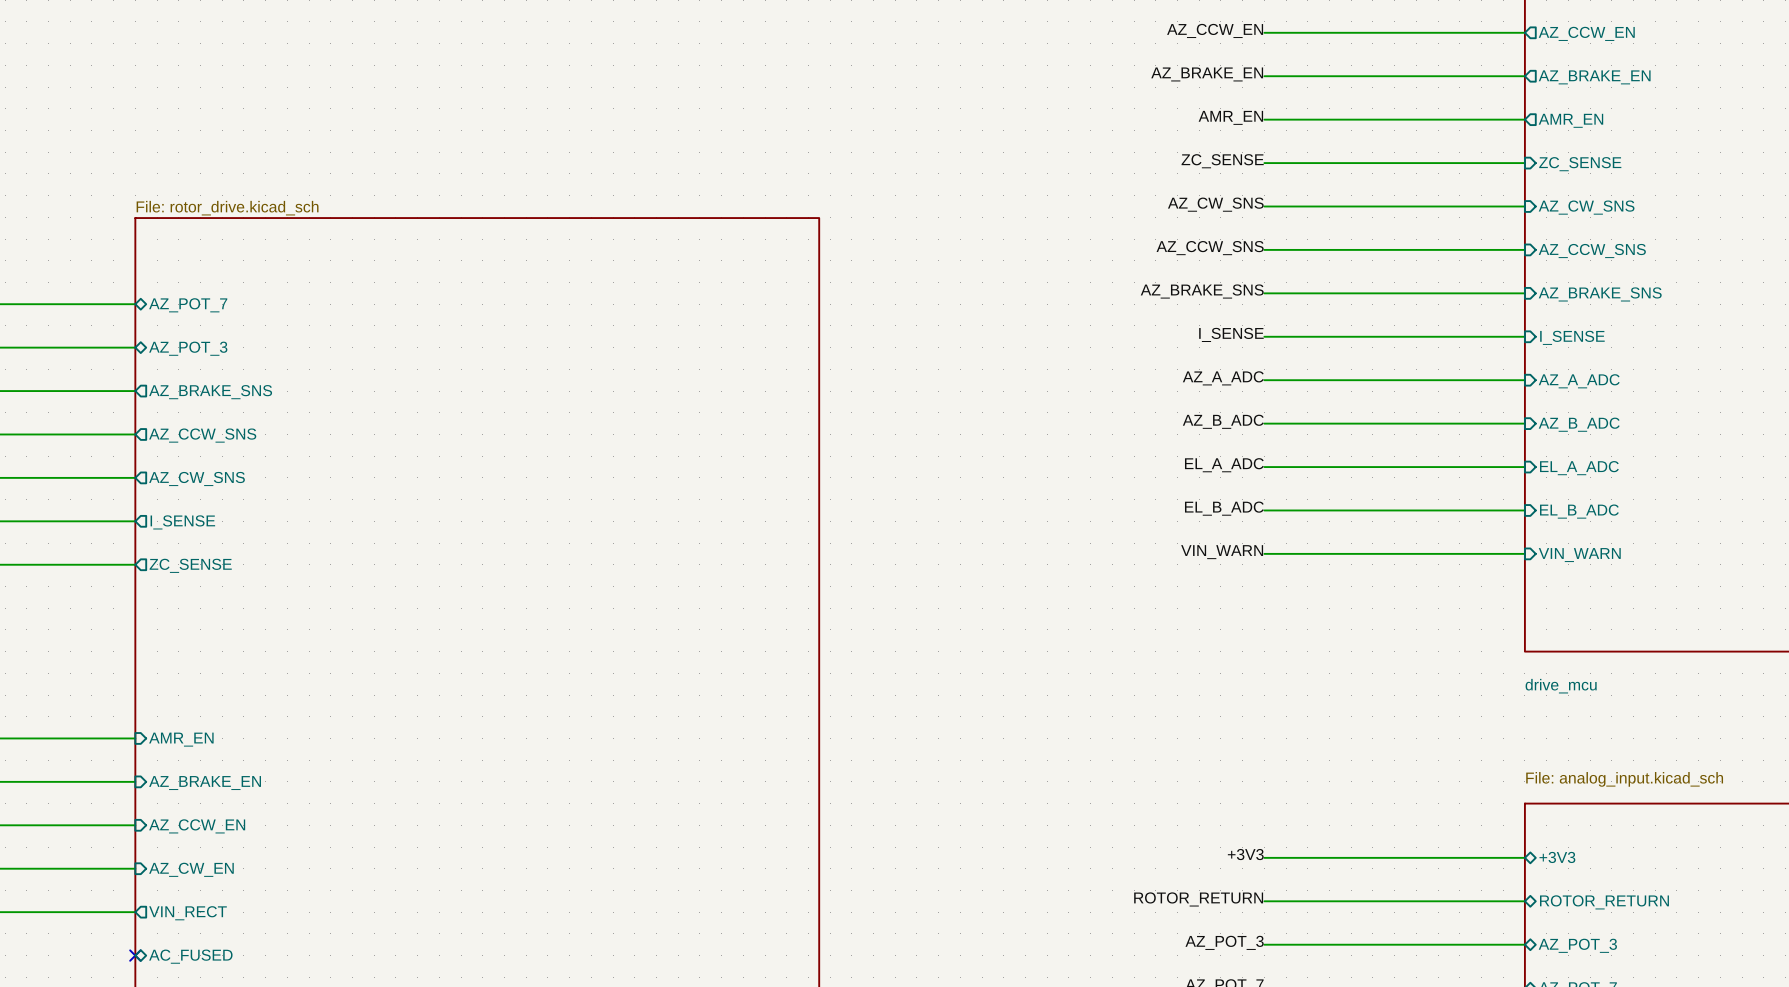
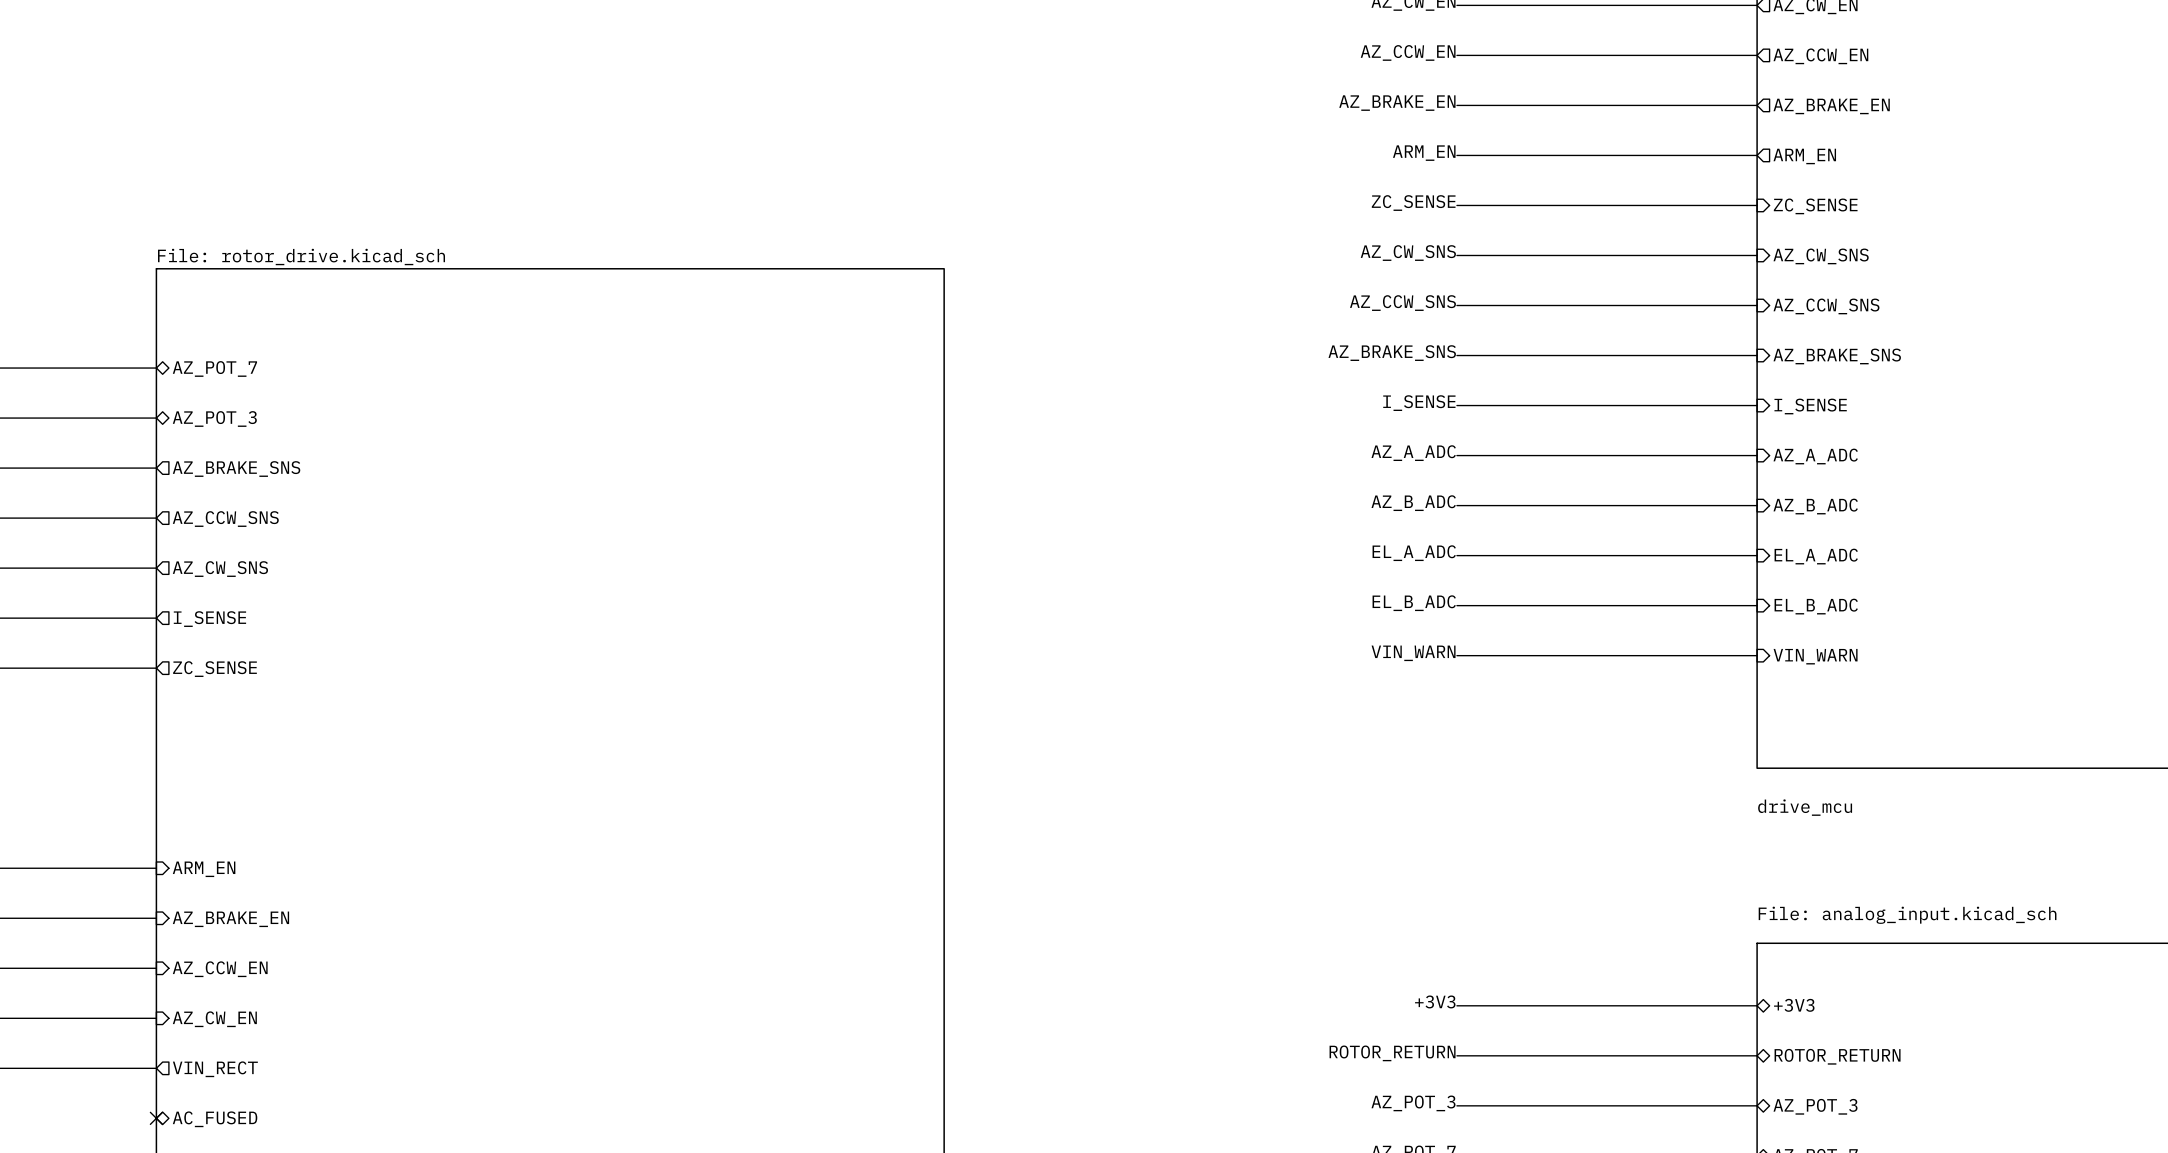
label: AMR_EN (1230, 117) -> ARM_EN (1424, 153)
sheet pin: AMR_EN (1570, 120) -> ARM_EN (1804, 156)
sheet pin: AMR_EN (181, 739) -> ARM_EN (204, 869)

